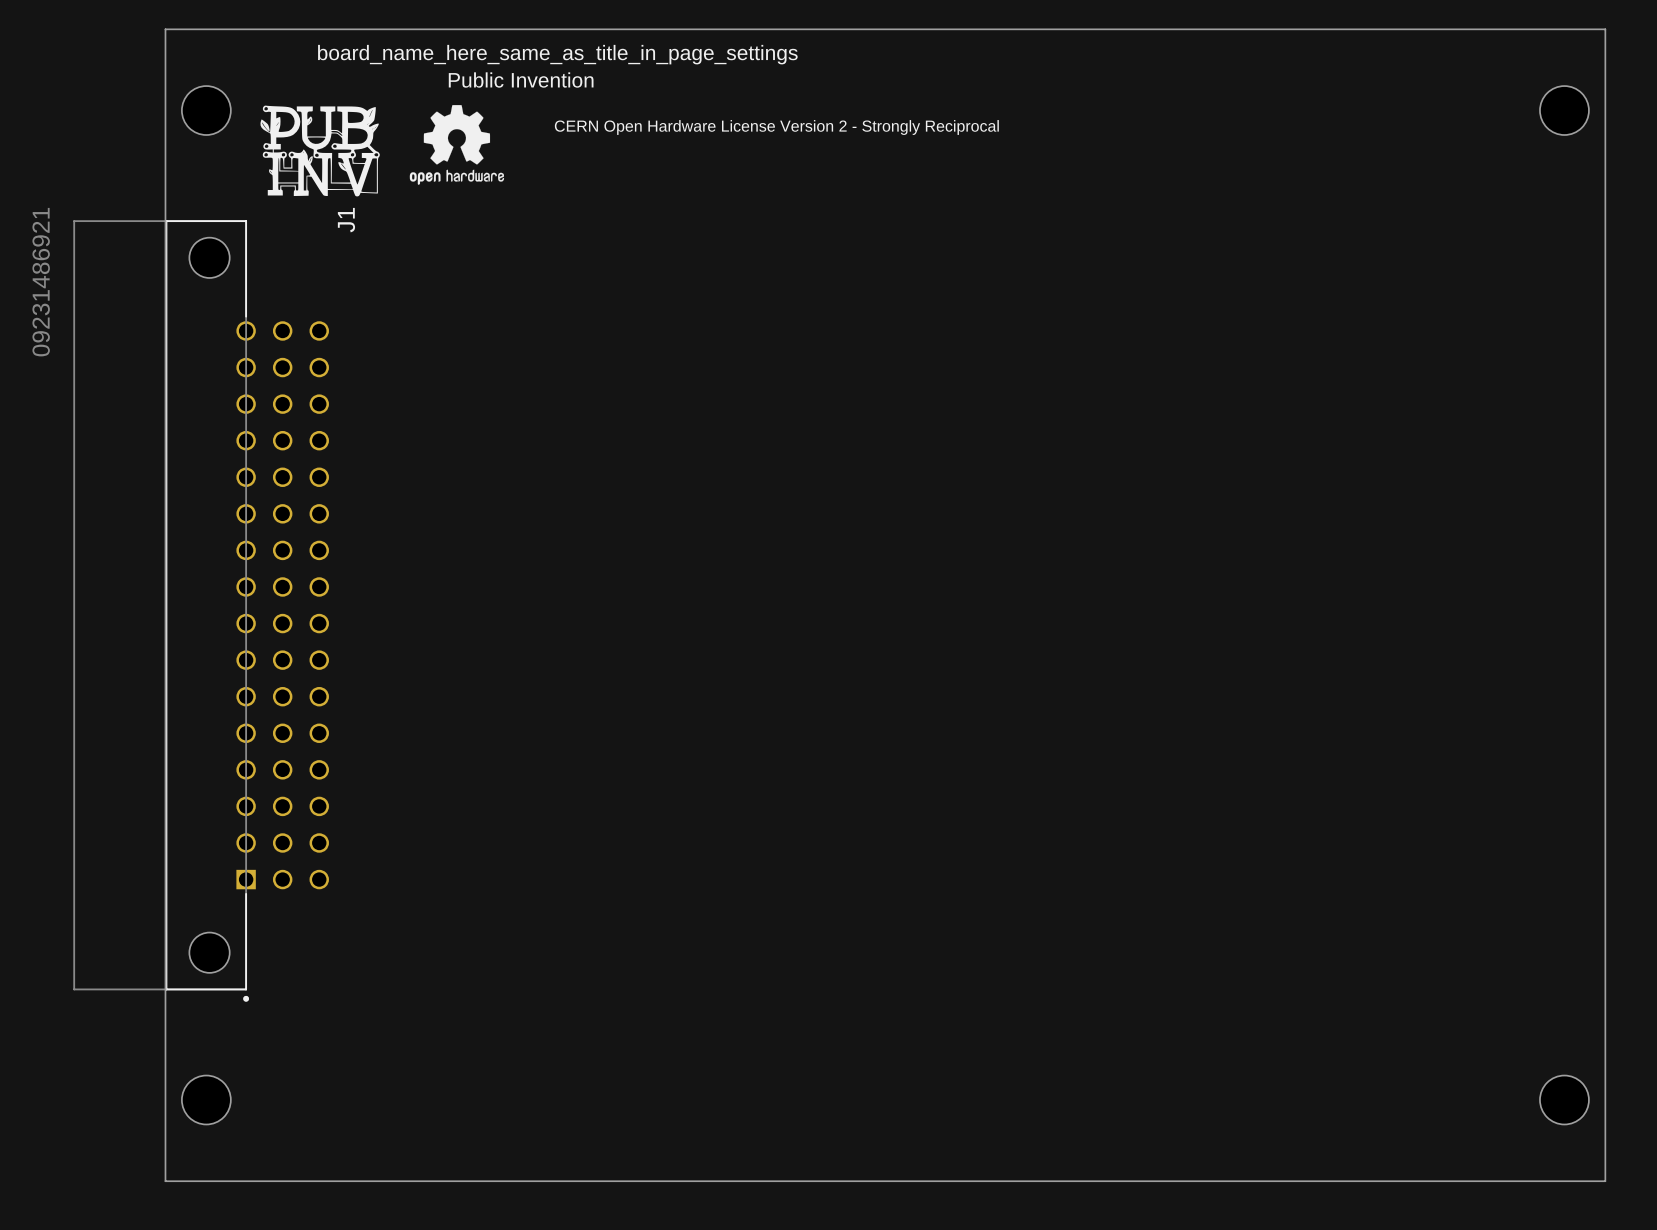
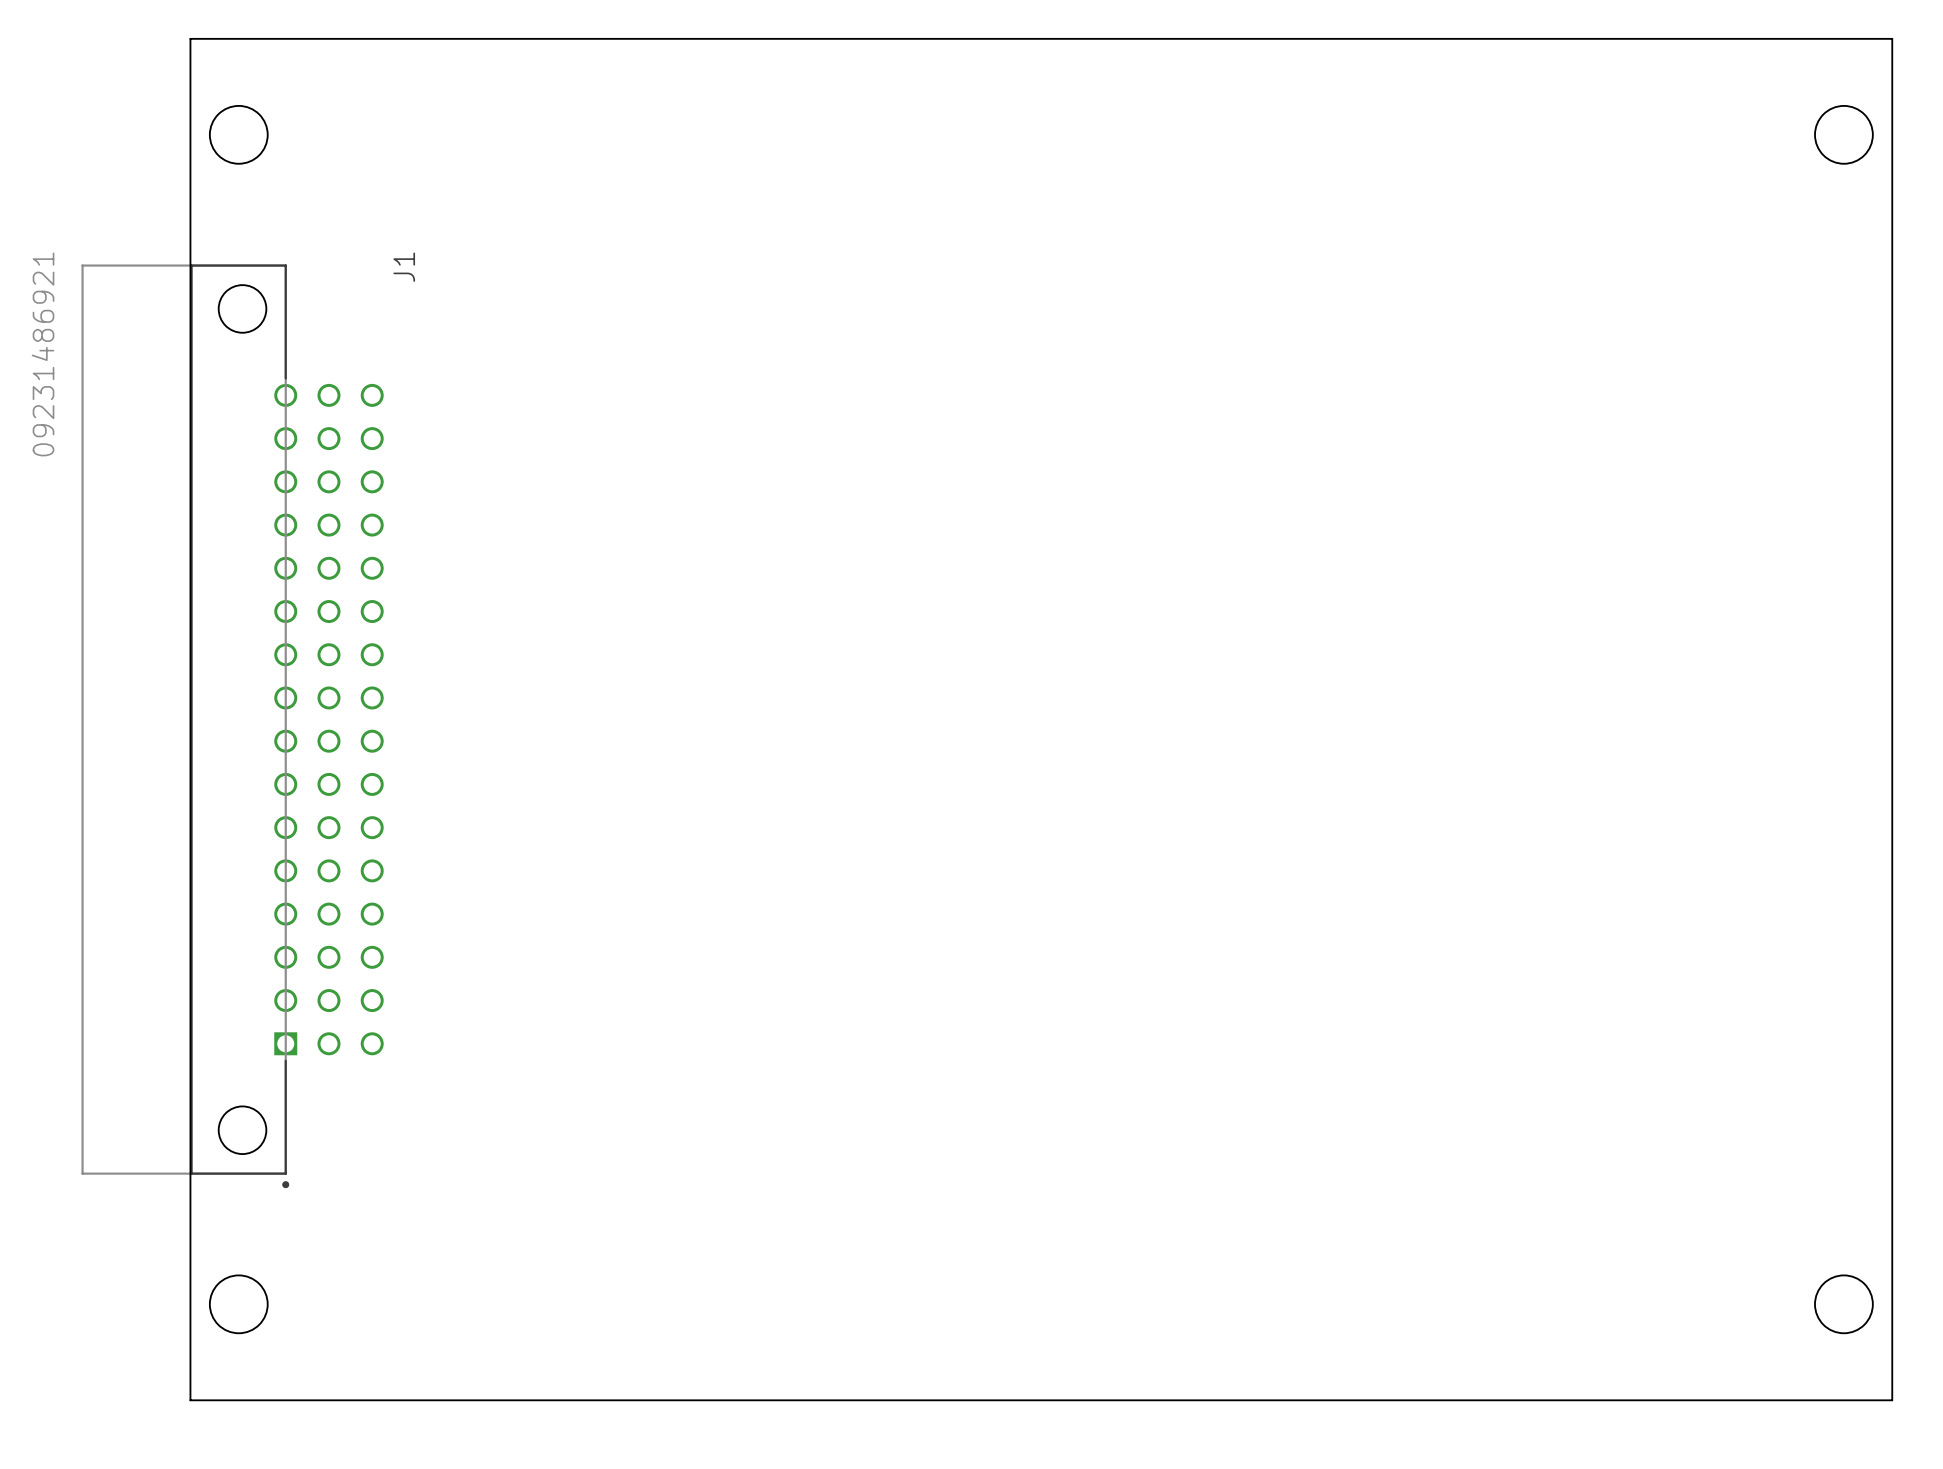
text: board_name_here_same_as_title_in_page_settings (557, 54) -> none
text: Public Invention (521, 80) -> none
drawing: [260, 105, 380, 197] -> none
drawing: [409, 105, 505, 185] -> none
text: CERN Open Hardware License Version 2 - Strongly Reciprocal (776, 127) -> none

